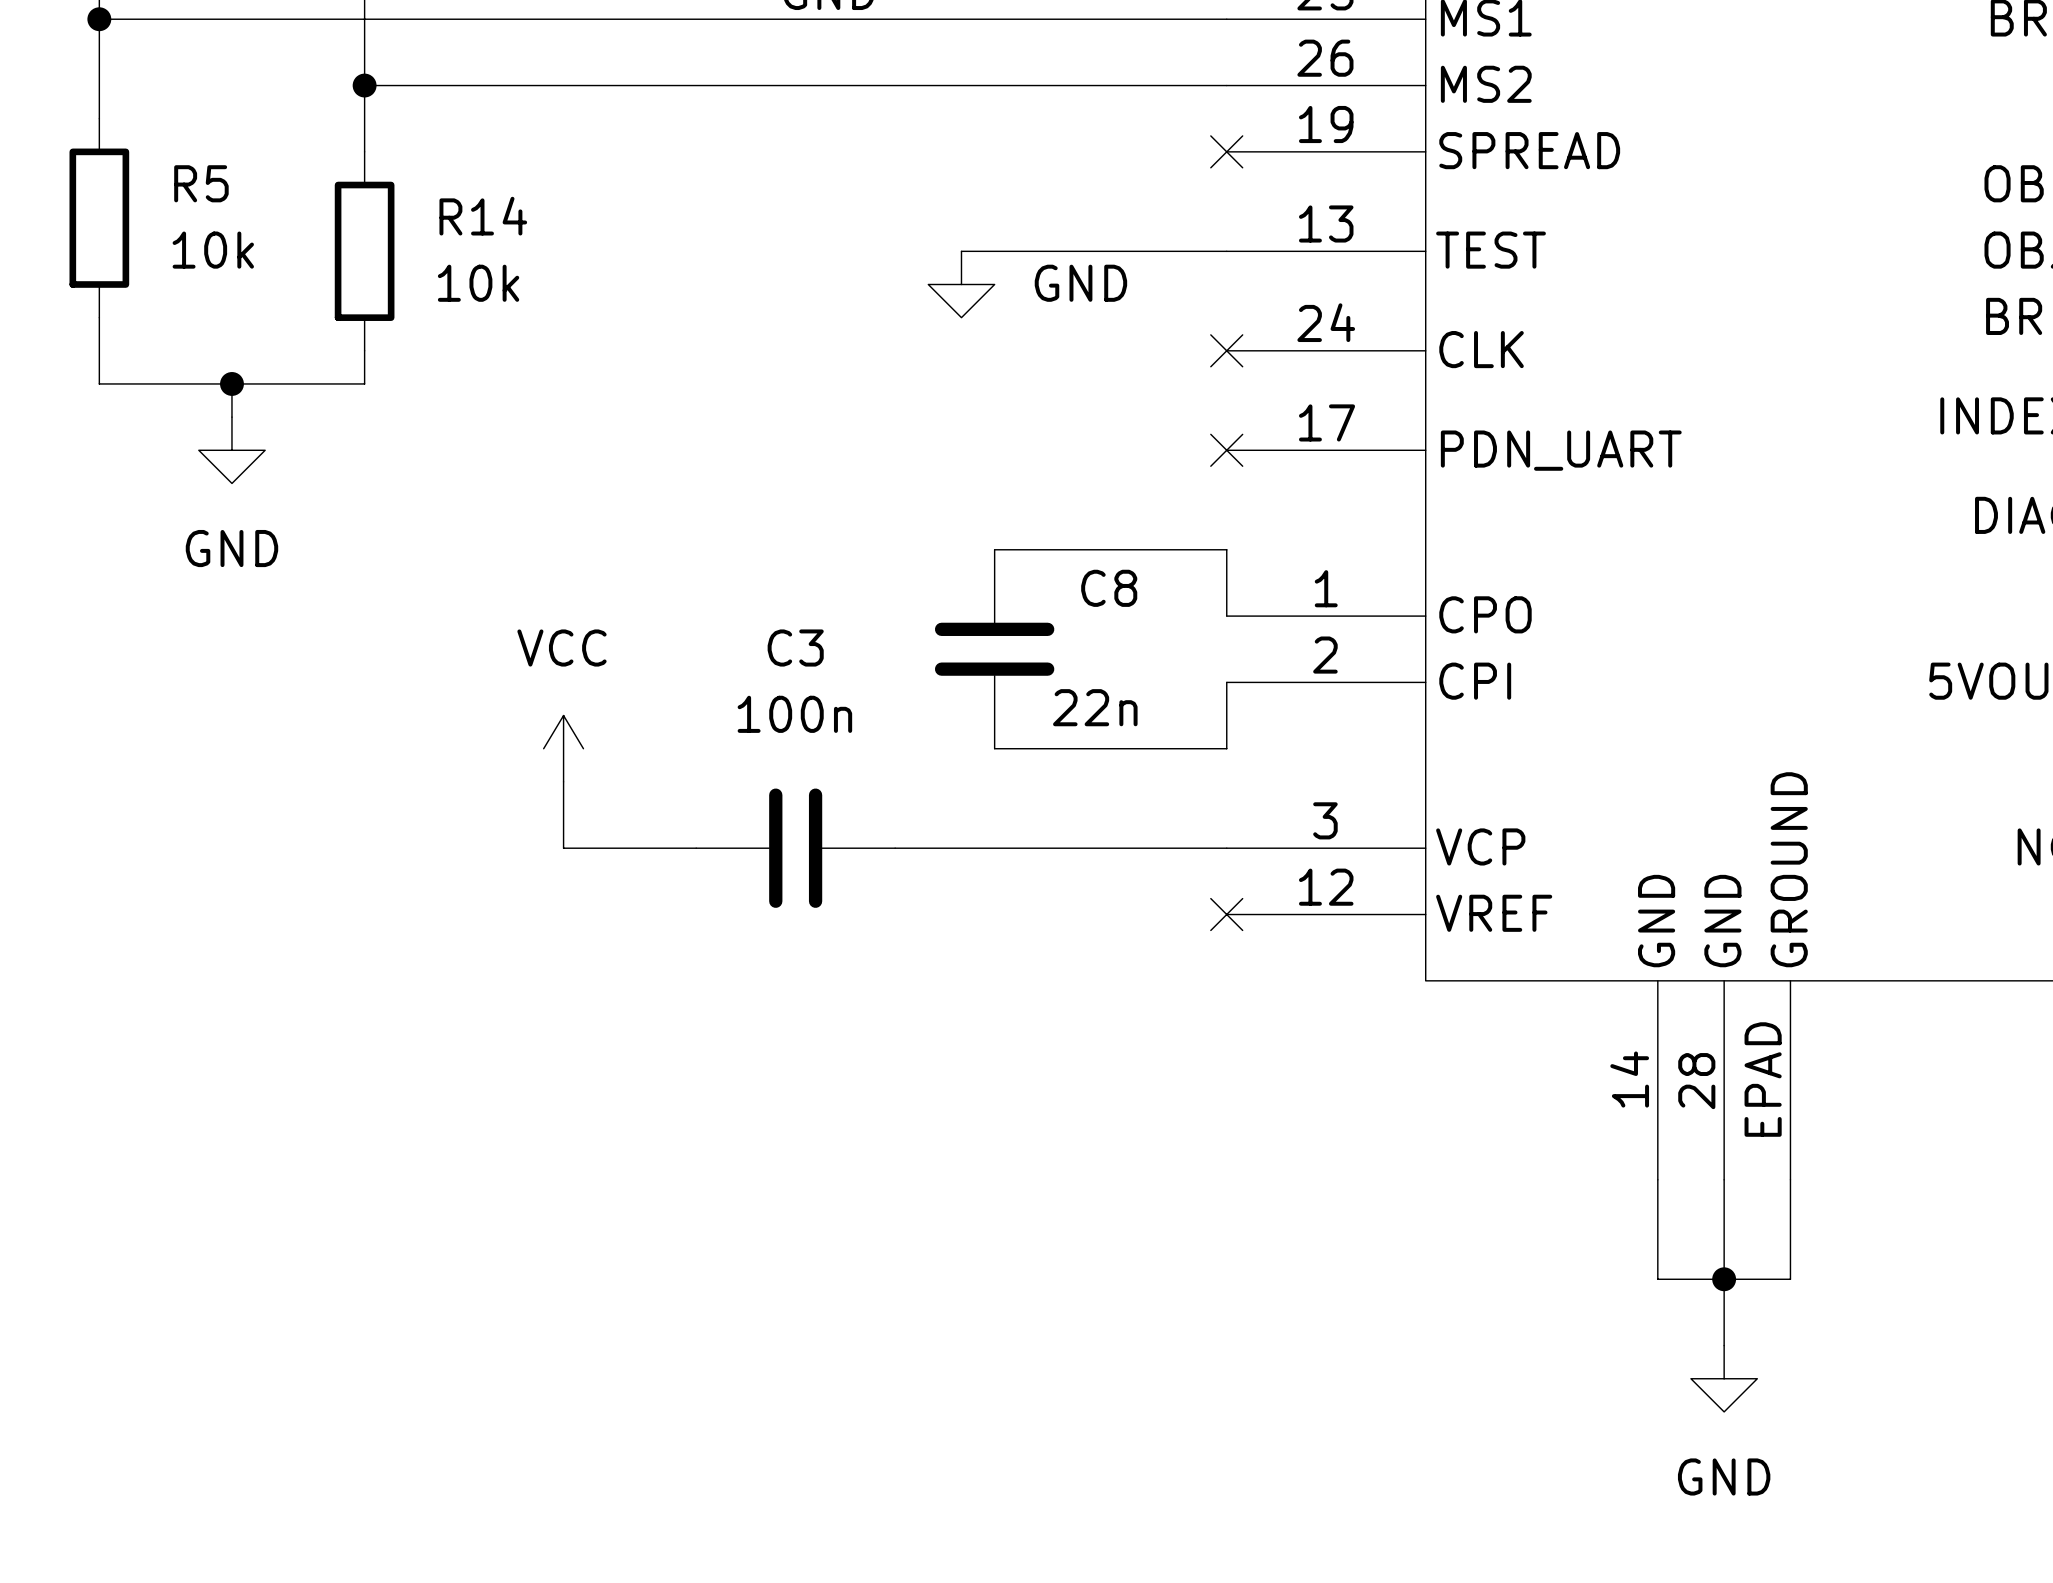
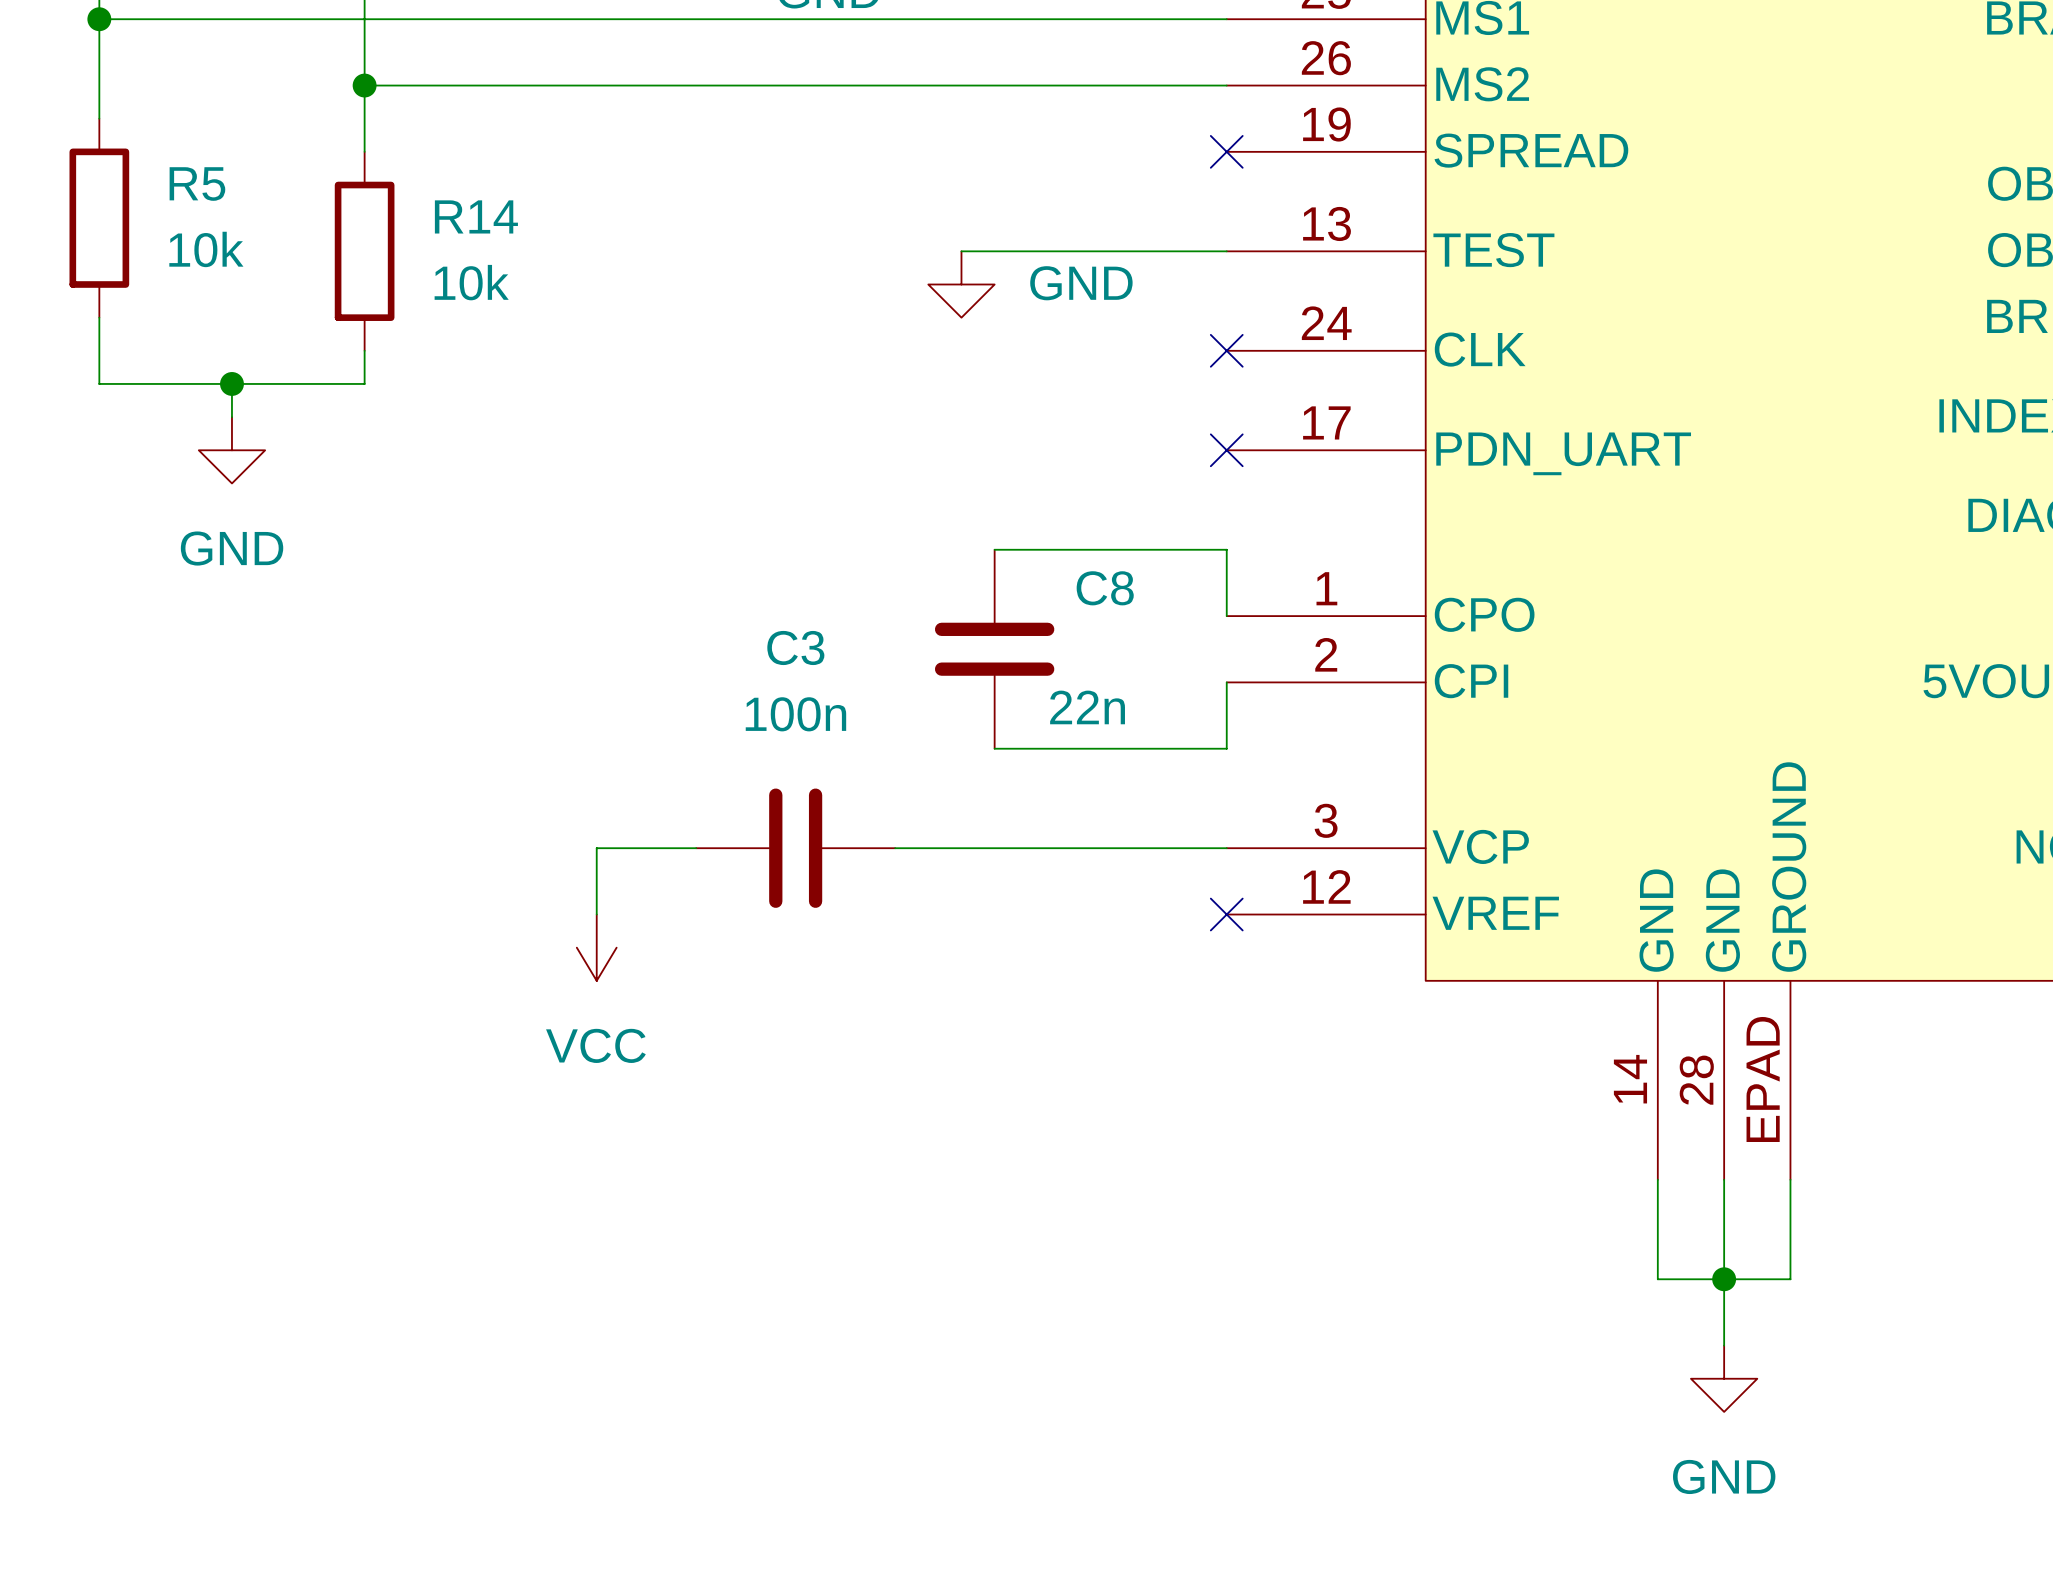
power symbol rotation: 0° (563, 748) -> 180° (596, 947)
power symbol position: VCC (563, 748) -> VCC (596, 947)
wire: (563, 781) (563, 848) (596, 848) -> (596, 914) (596, 848)

